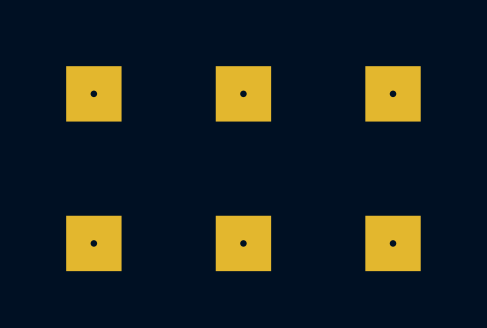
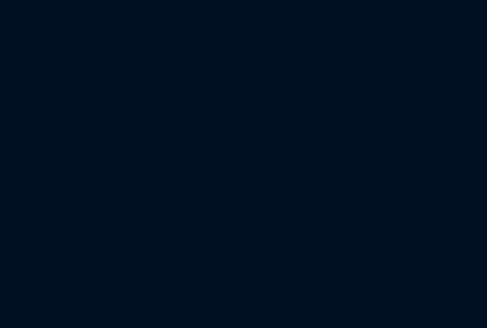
part: (93, 93) -> none
part: (243, 93) -> none
part: (393, 93) -> none
part: (93, 243) -> none
part: (243, 243) -> none
part: (393, 243) -> none

